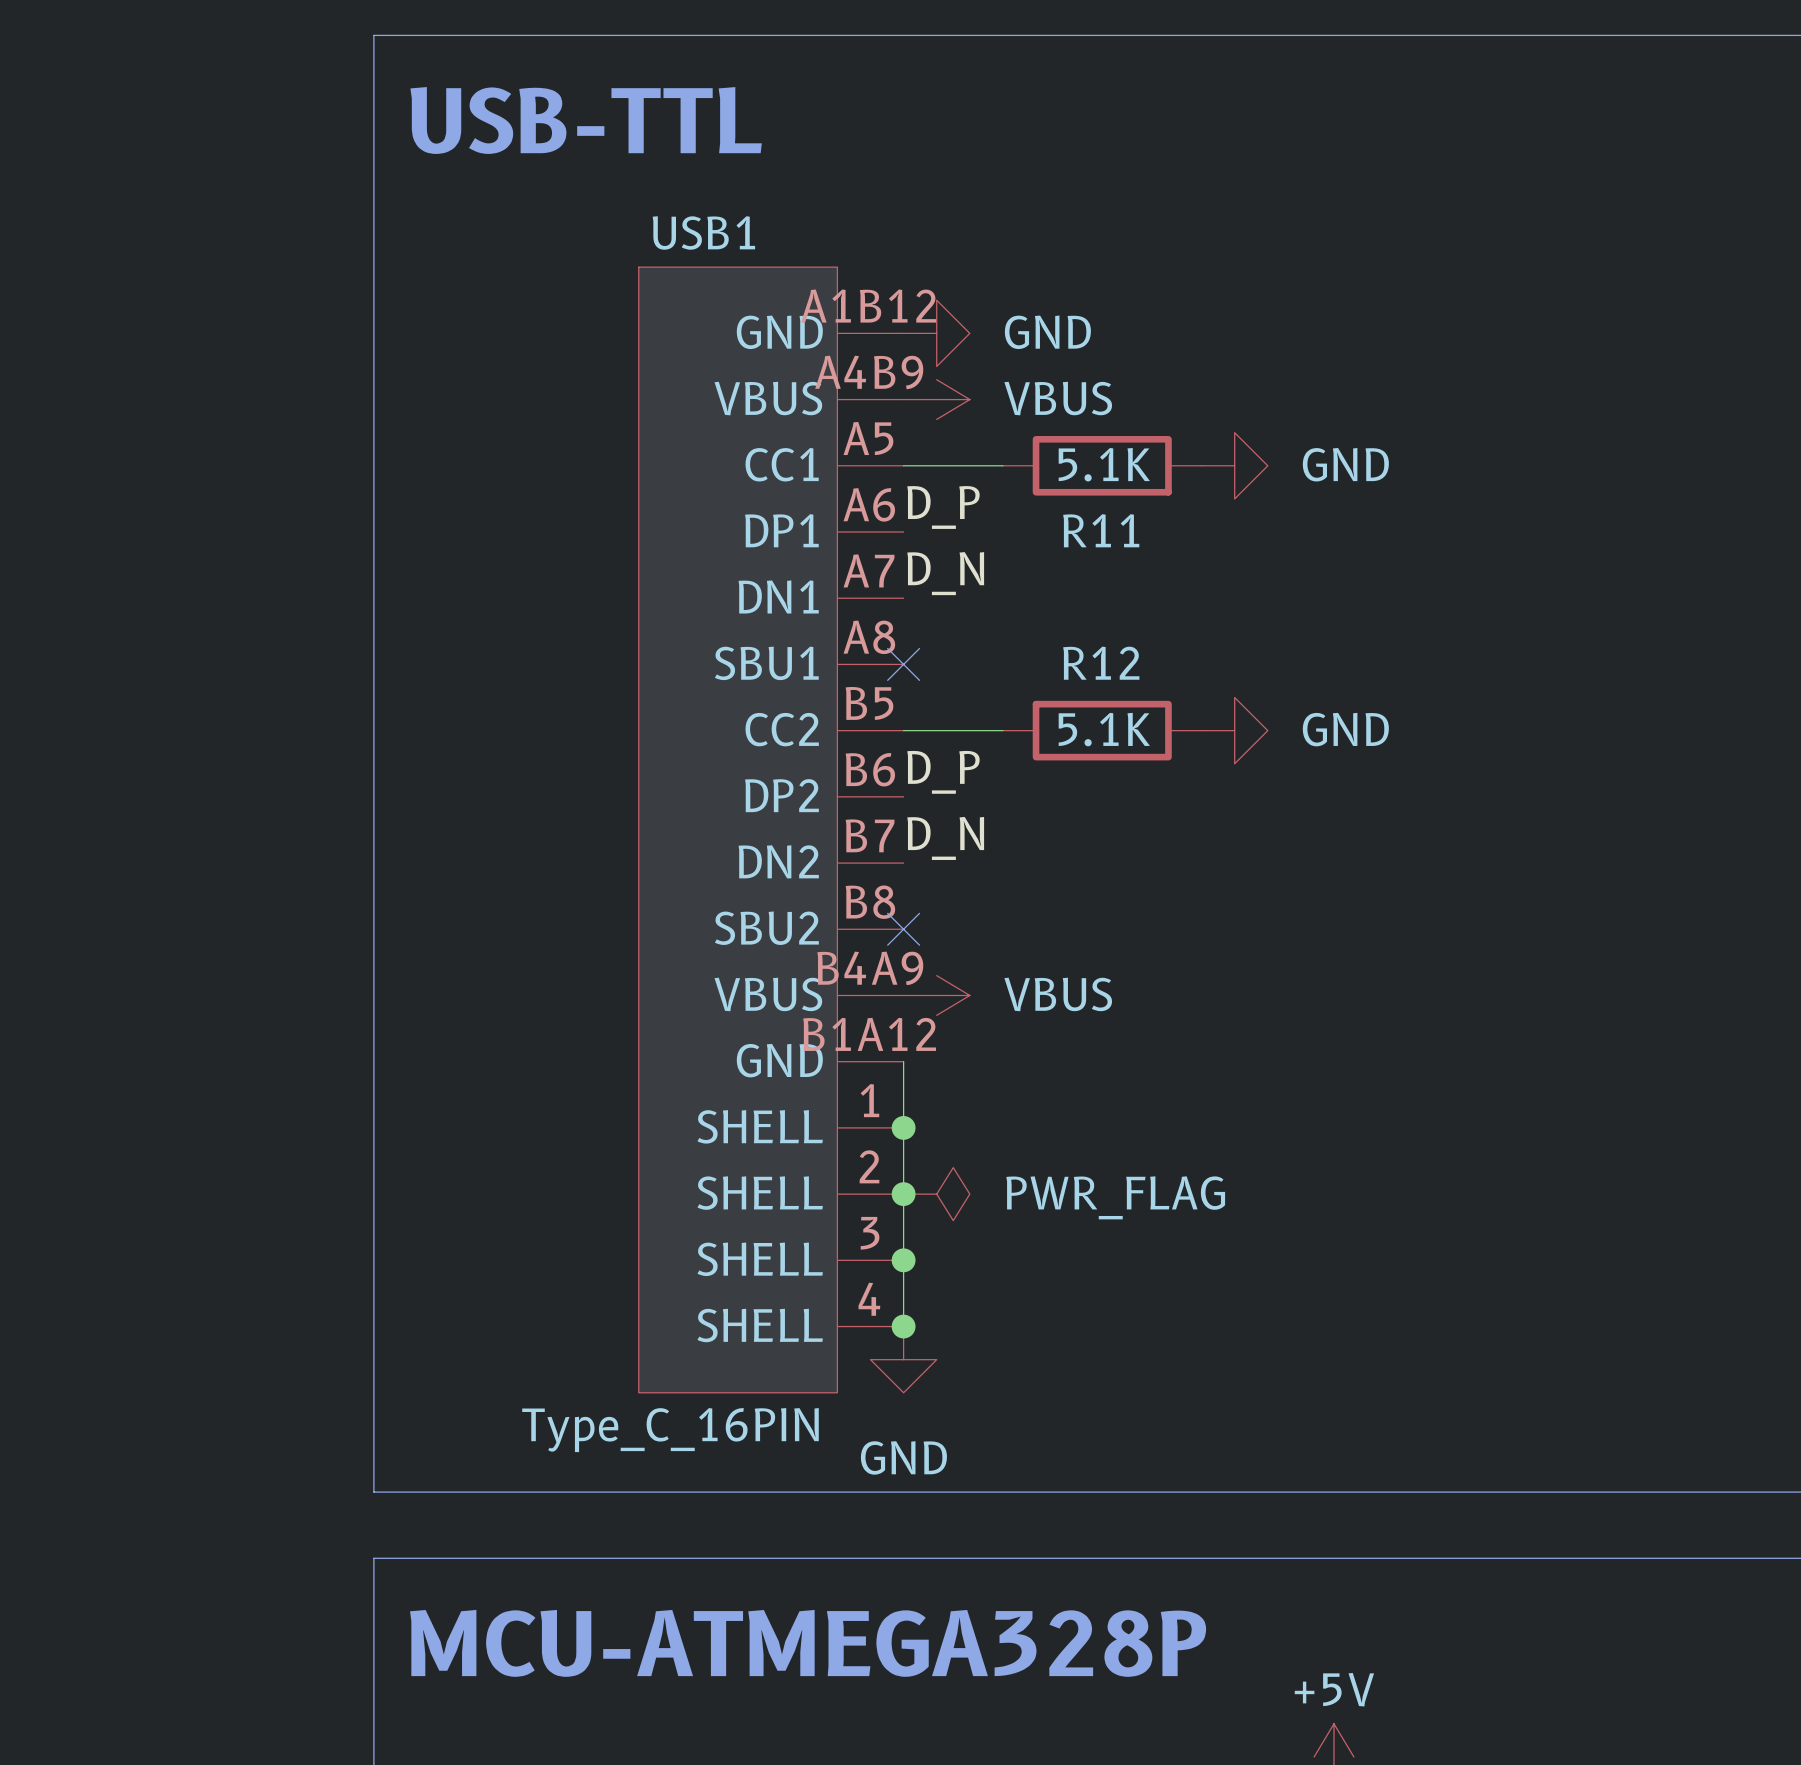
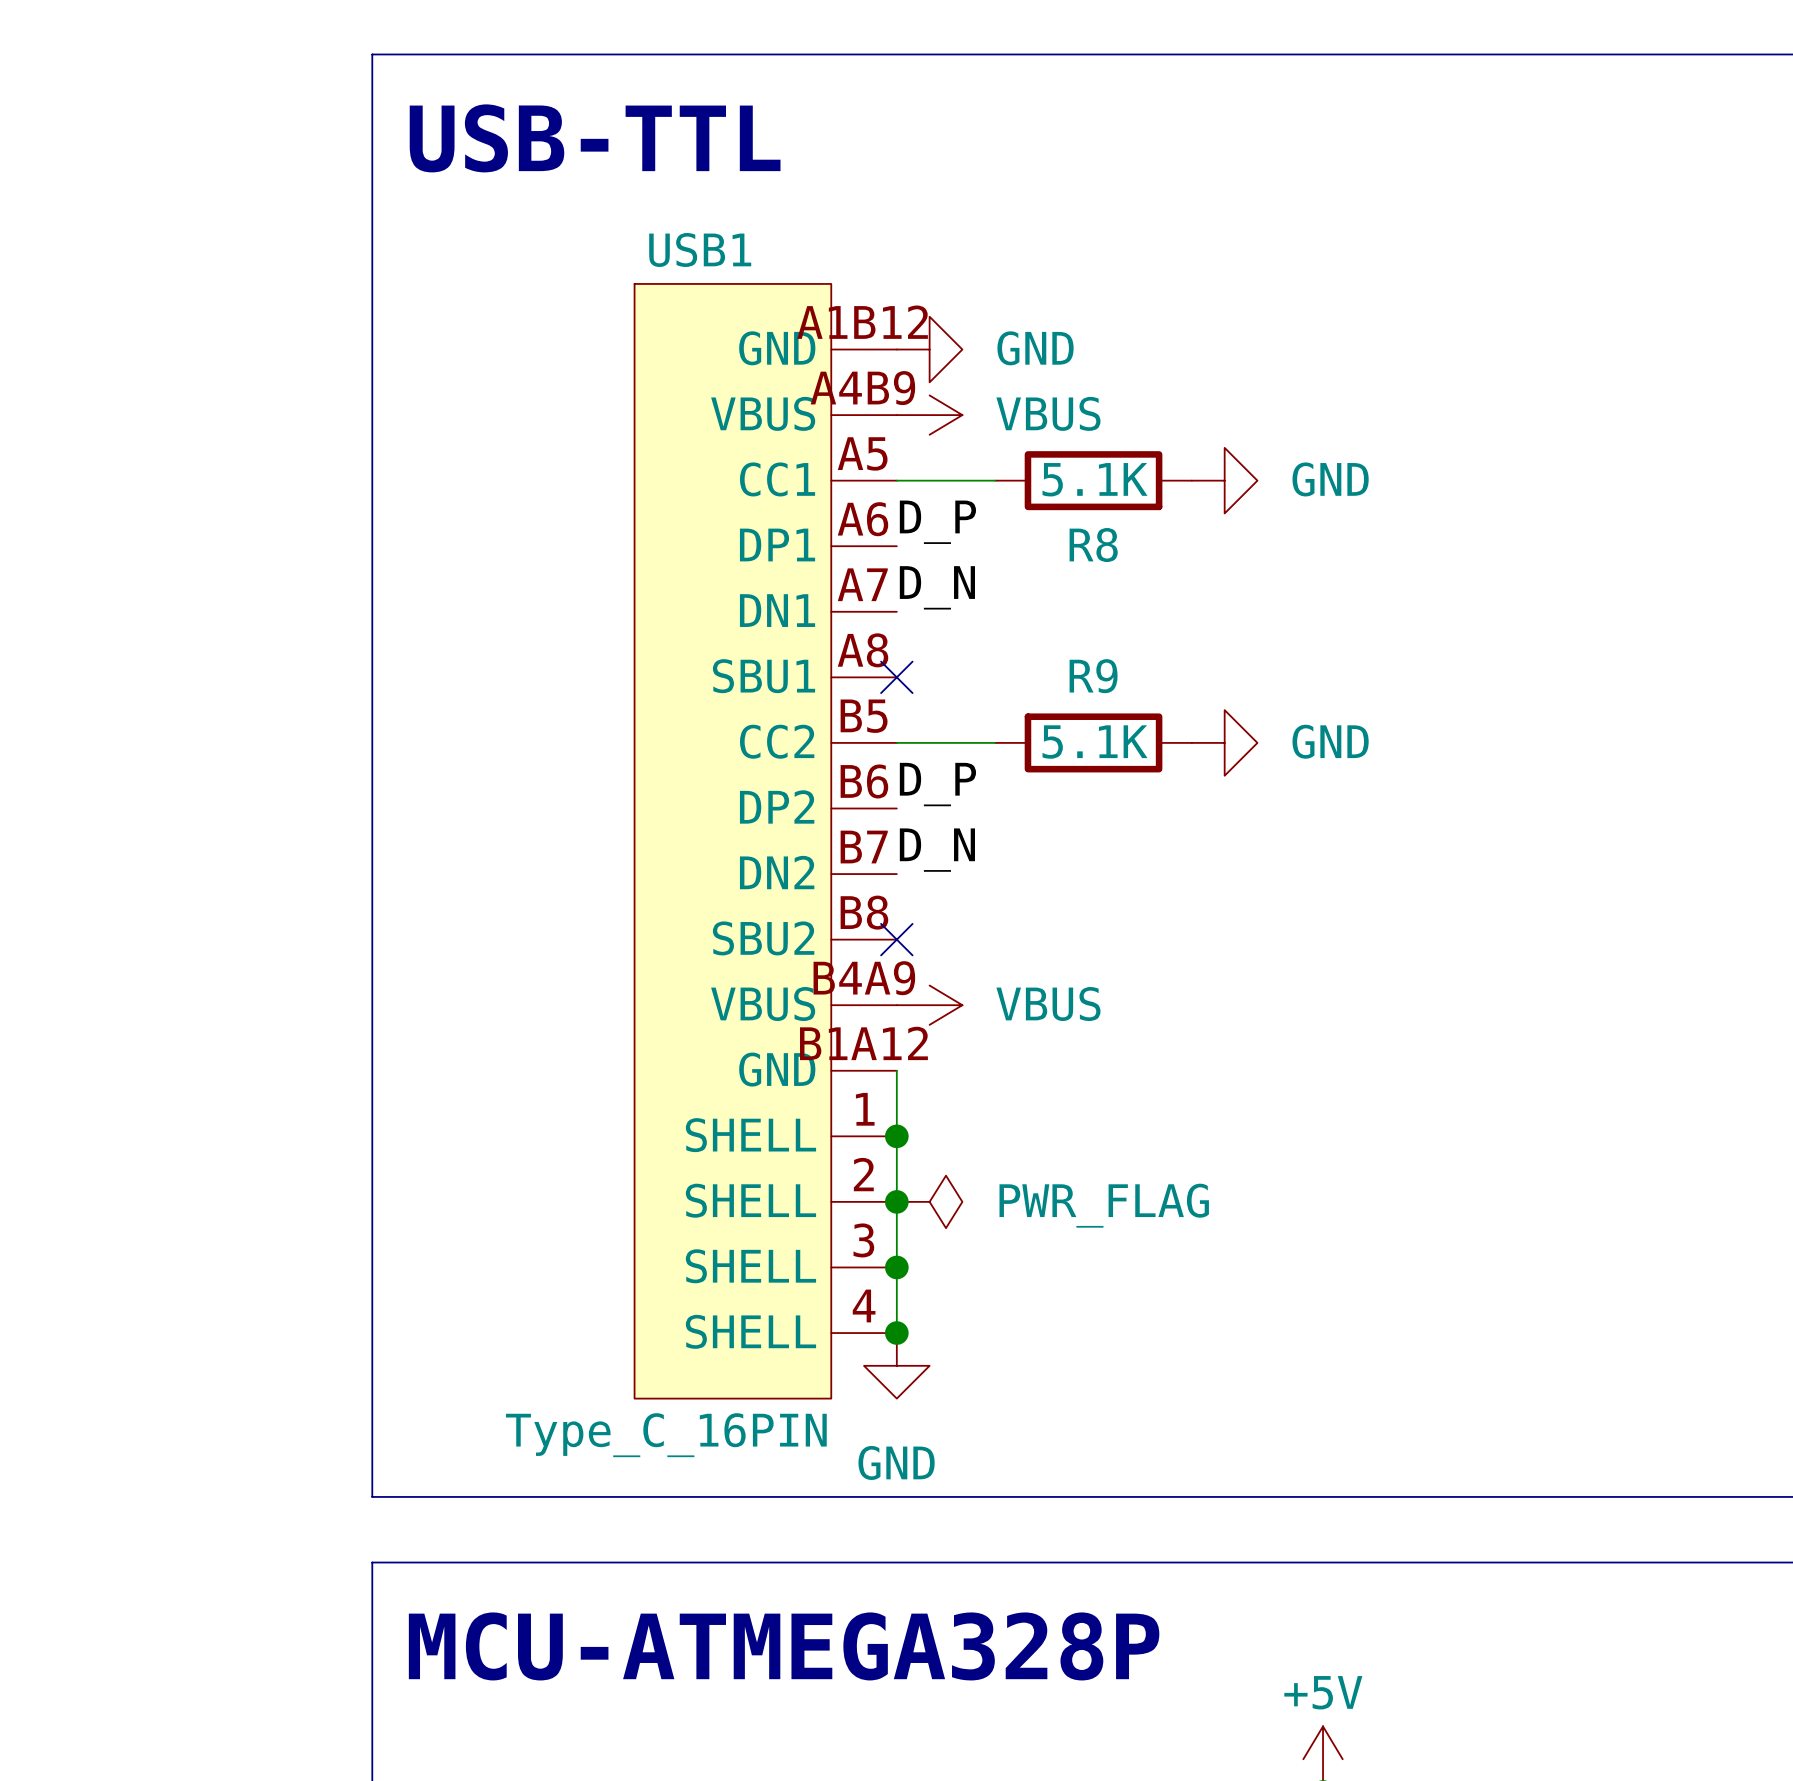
R11 name: R11 (1101, 530) -> R8 (1093, 545)
R12 name: R12 (1101, 663) -> R9 (1093, 676)

